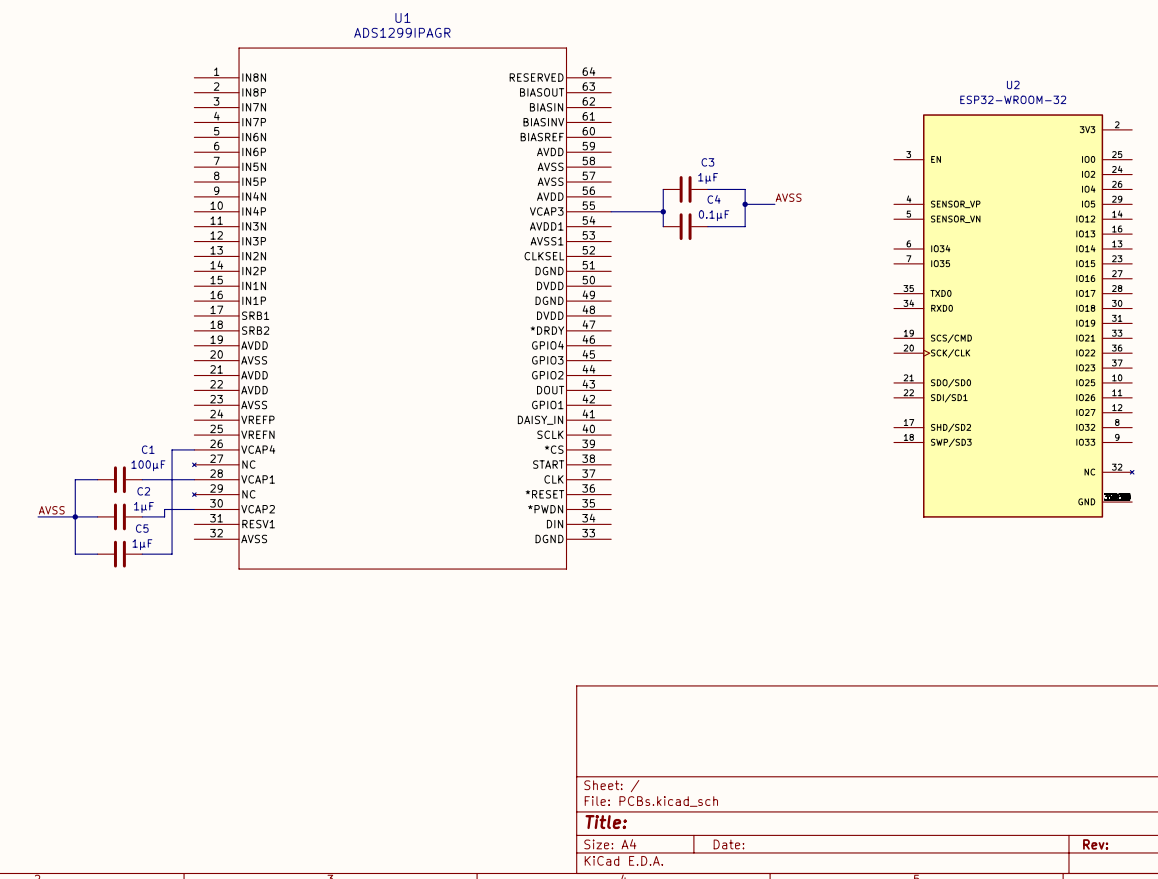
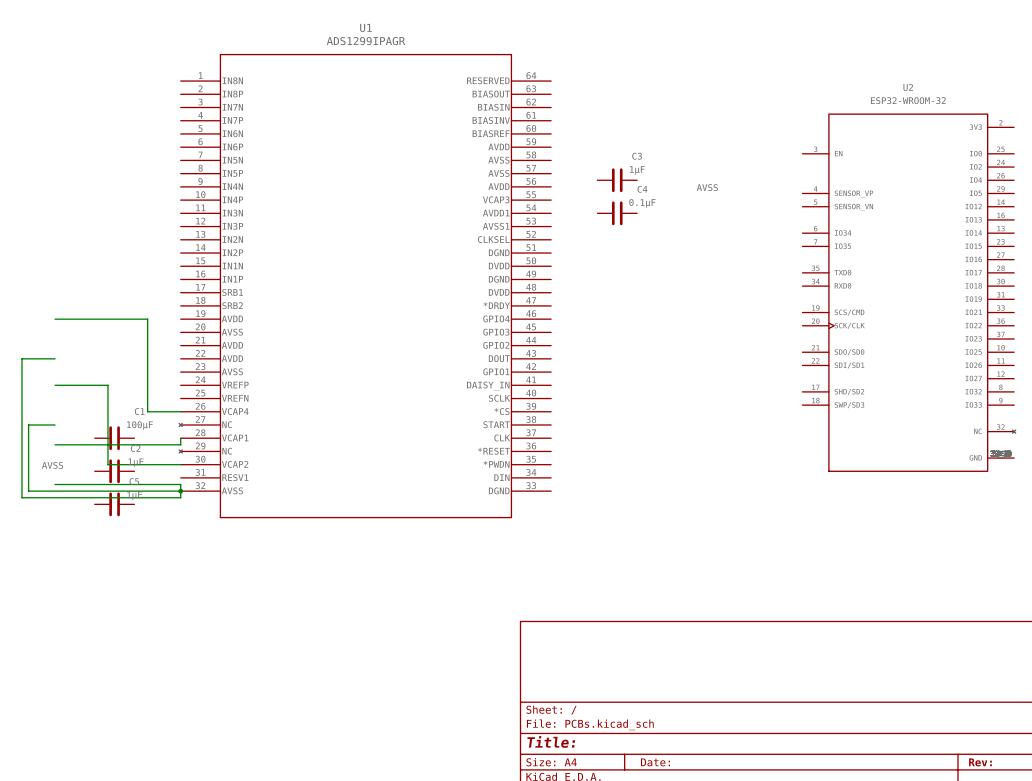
wire: (663, 189) (663, 226) -> none
wire: (707, 189) (745, 189) (745, 226) (707, 226) -> none
wire: (745, 204) (774, 204) -> none
junction: (745, 204) -> none
wire: (611, 211) (663, 211) -> none
junction: (663, 211) -> none
wire: none -> (55, 358) (21, 358) (21, 497) (180, 497) (180, 484) (55, 484)
wire: (172, 449) (172, 554) (142, 554) -> (160, 411) (147, 411) (147, 319) (55, 319)
wire: none -> (55, 424) (28, 424) (28, 491) (180, 491)
wire: (97, 479) (75, 479) (75, 554) (97, 554) -> none
wire: (142, 479) (194, 479) -> (55, 444) (180, 444) (180, 438)
wire: (164, 509) (164, 516) (142, 516) -> (154, 464) (107, 464) (107, 385) (55, 385)
wire: (38, 516) (97, 516) -> none
junction: (75, 516) -> none
junction: none -> (180, 491)

